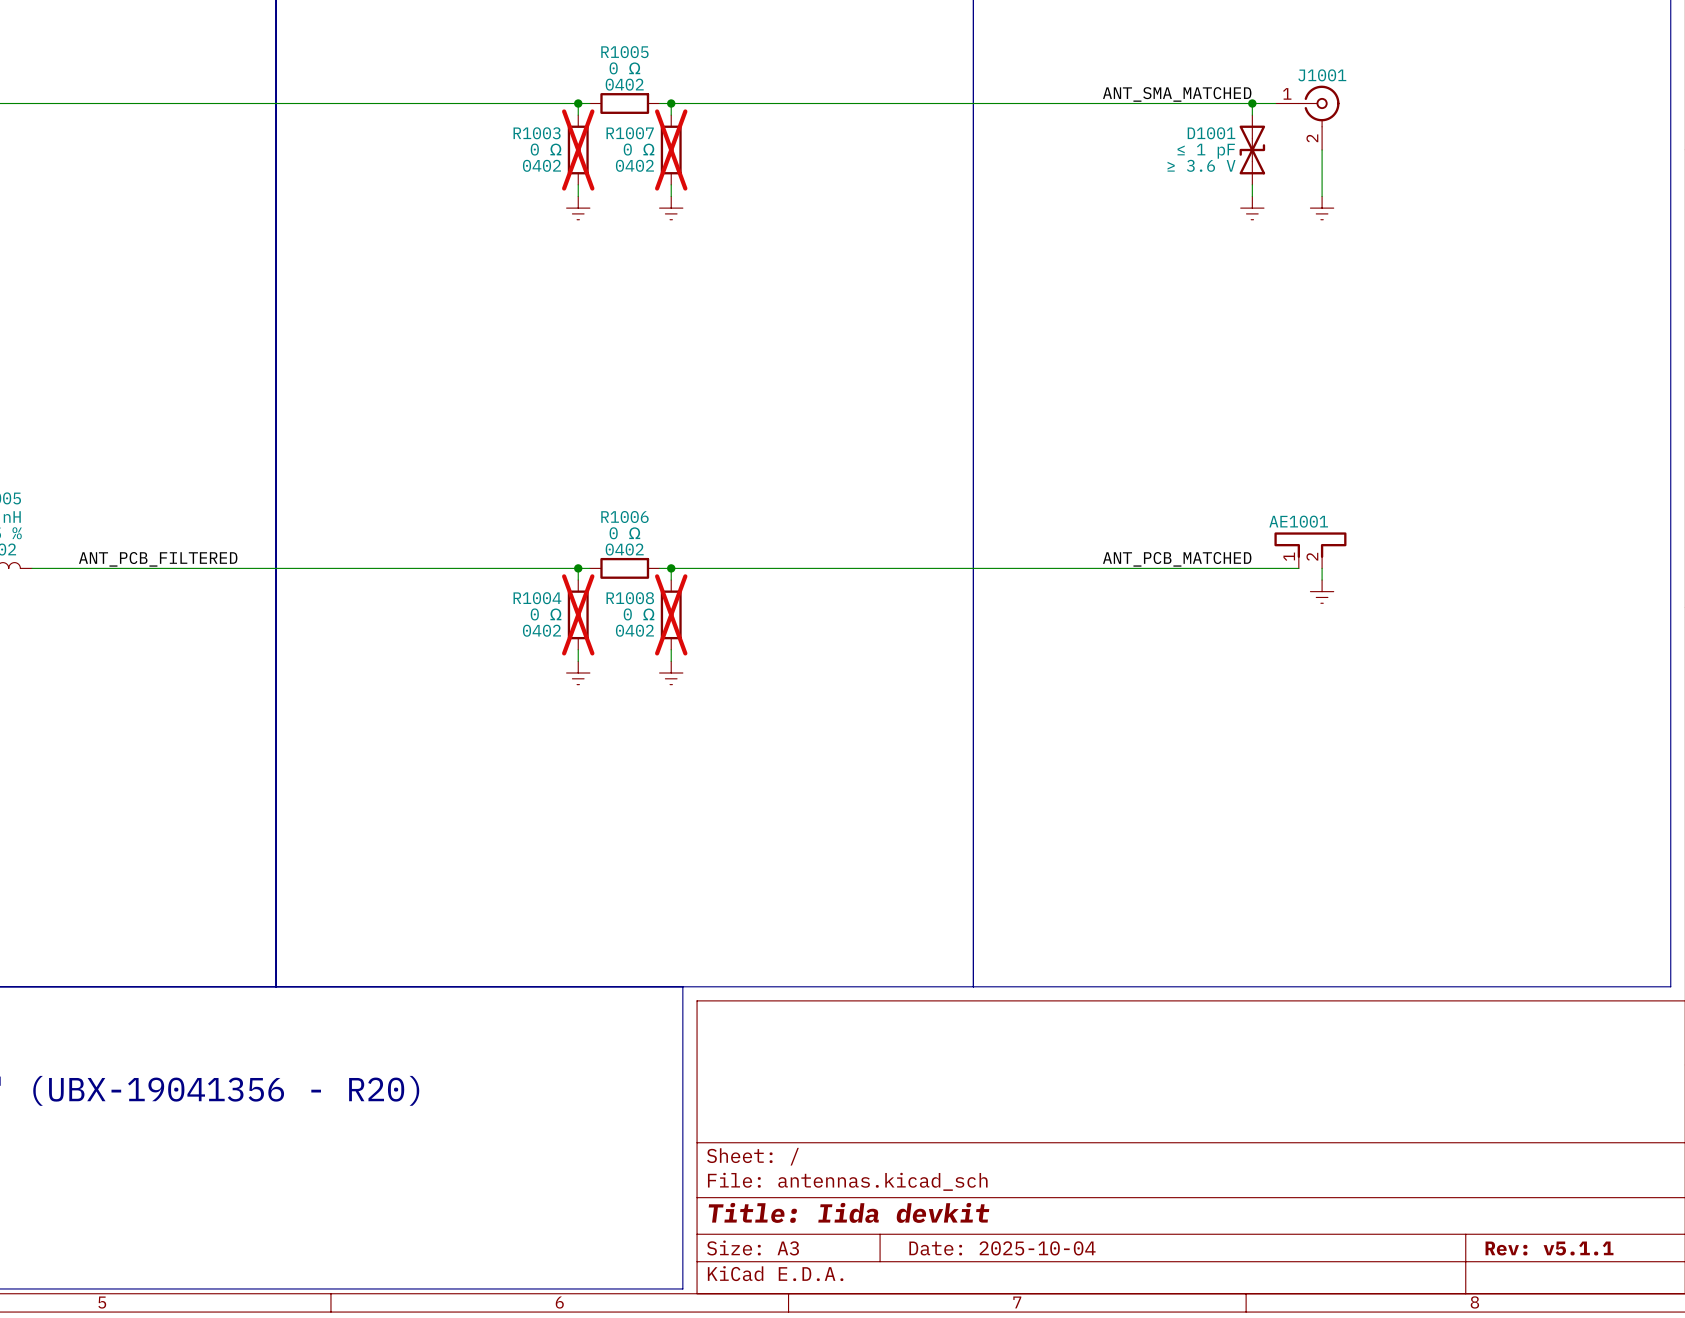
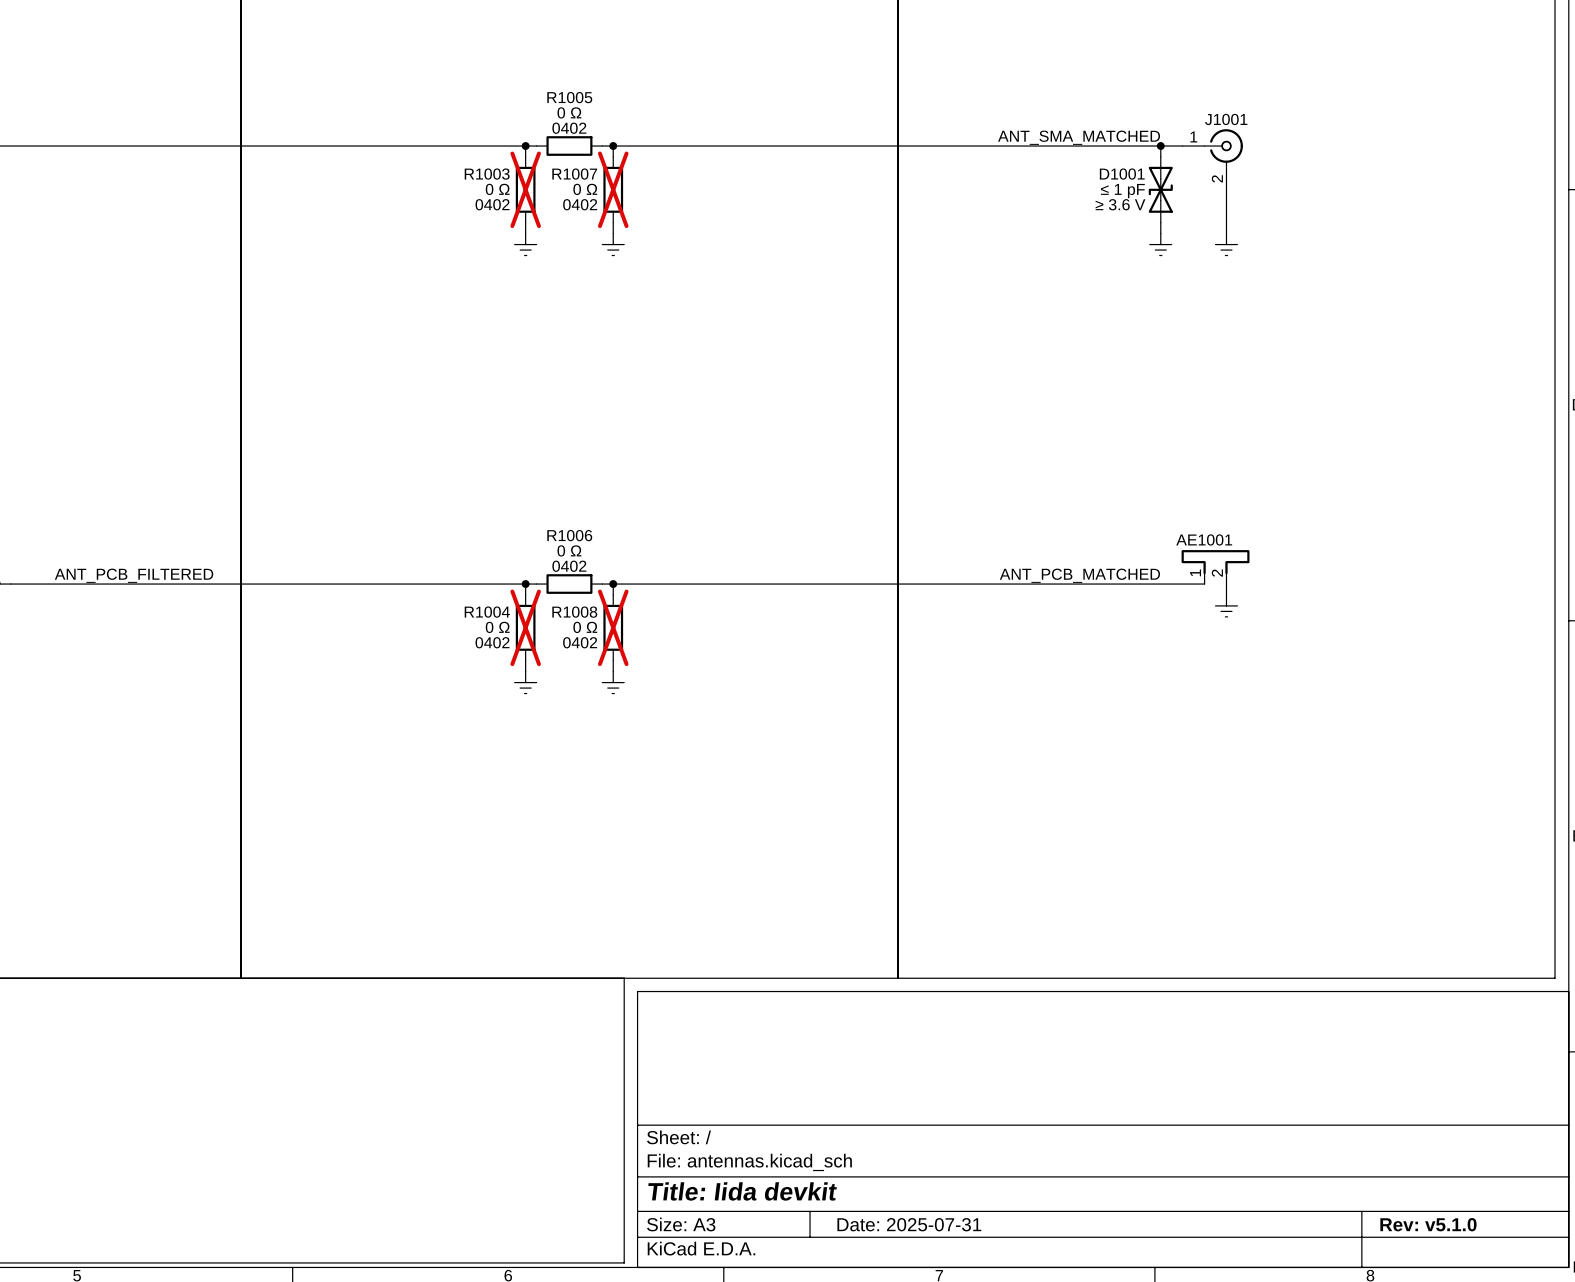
title block: Date: 2025-10-04 (1002, 1248) -> Date: 2025-07-31 (909, 1224)
title block: Rev: v5.1.1 (1549, 1248) -> Rev: v5.1.0 (1428, 1224)

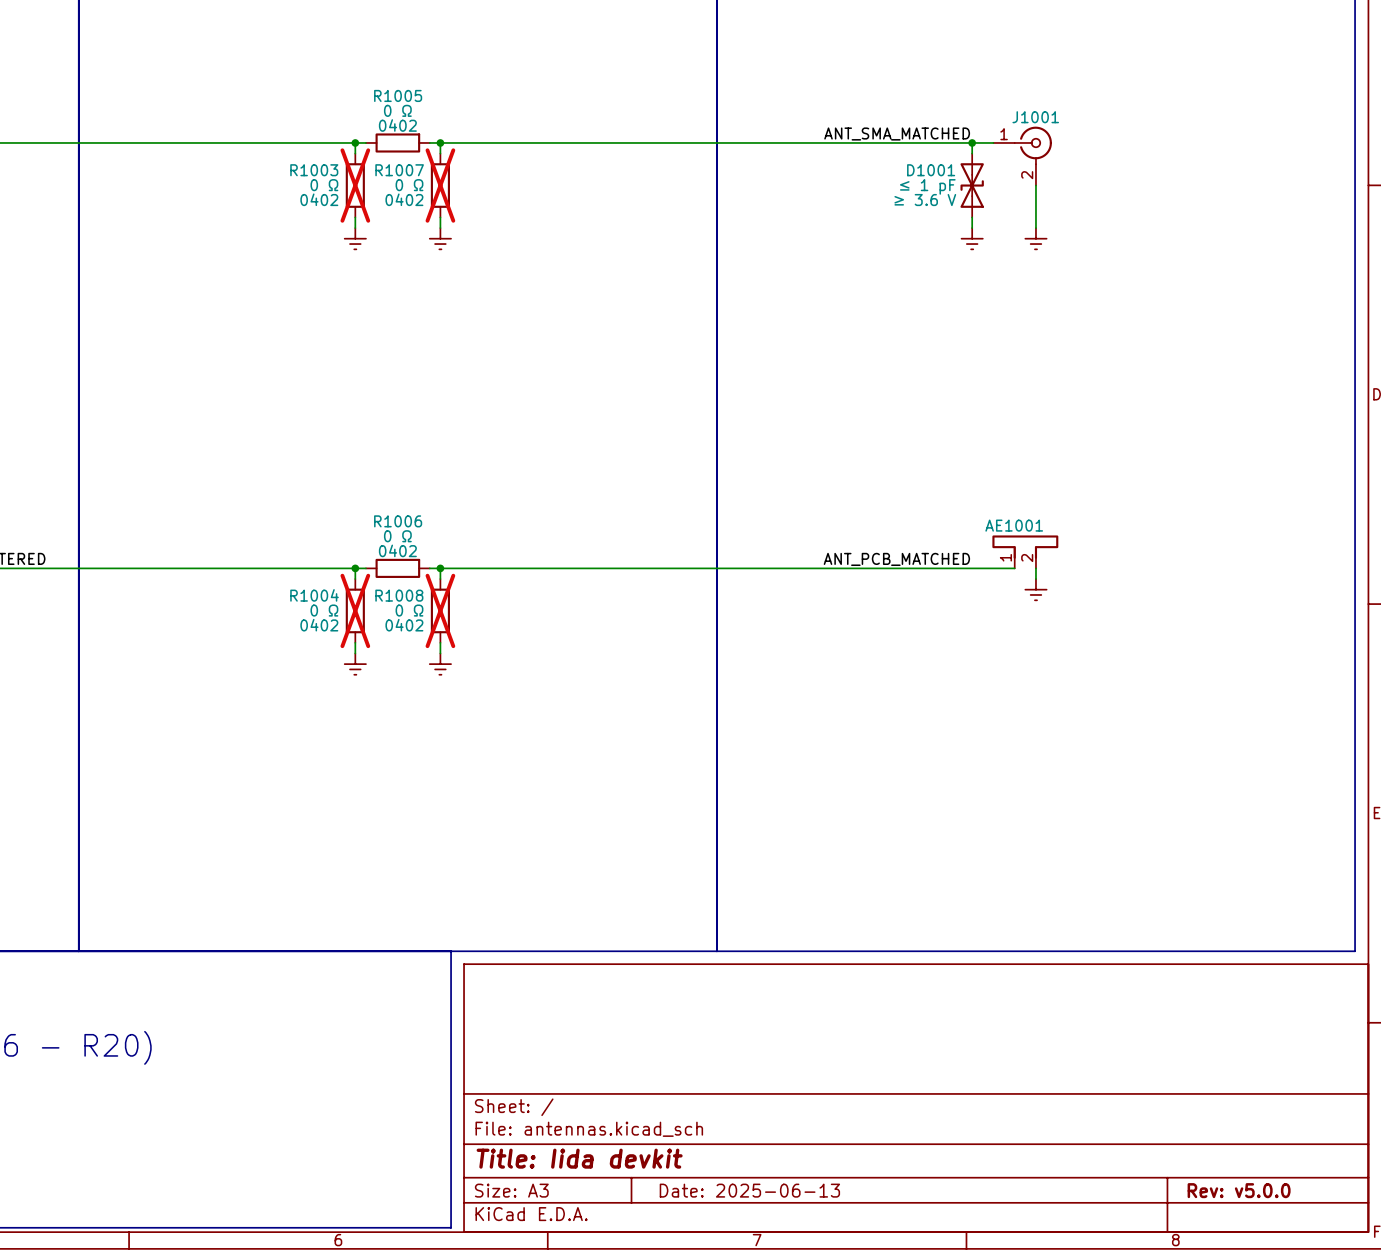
title block: Date: 2025-07-31 (909, 1224) -> Date: 2025-06-13 (749, 1190)
title block: Rev: v5.1.0 (1428, 1224) -> Rev: v5.0.0 (1239, 1190)

